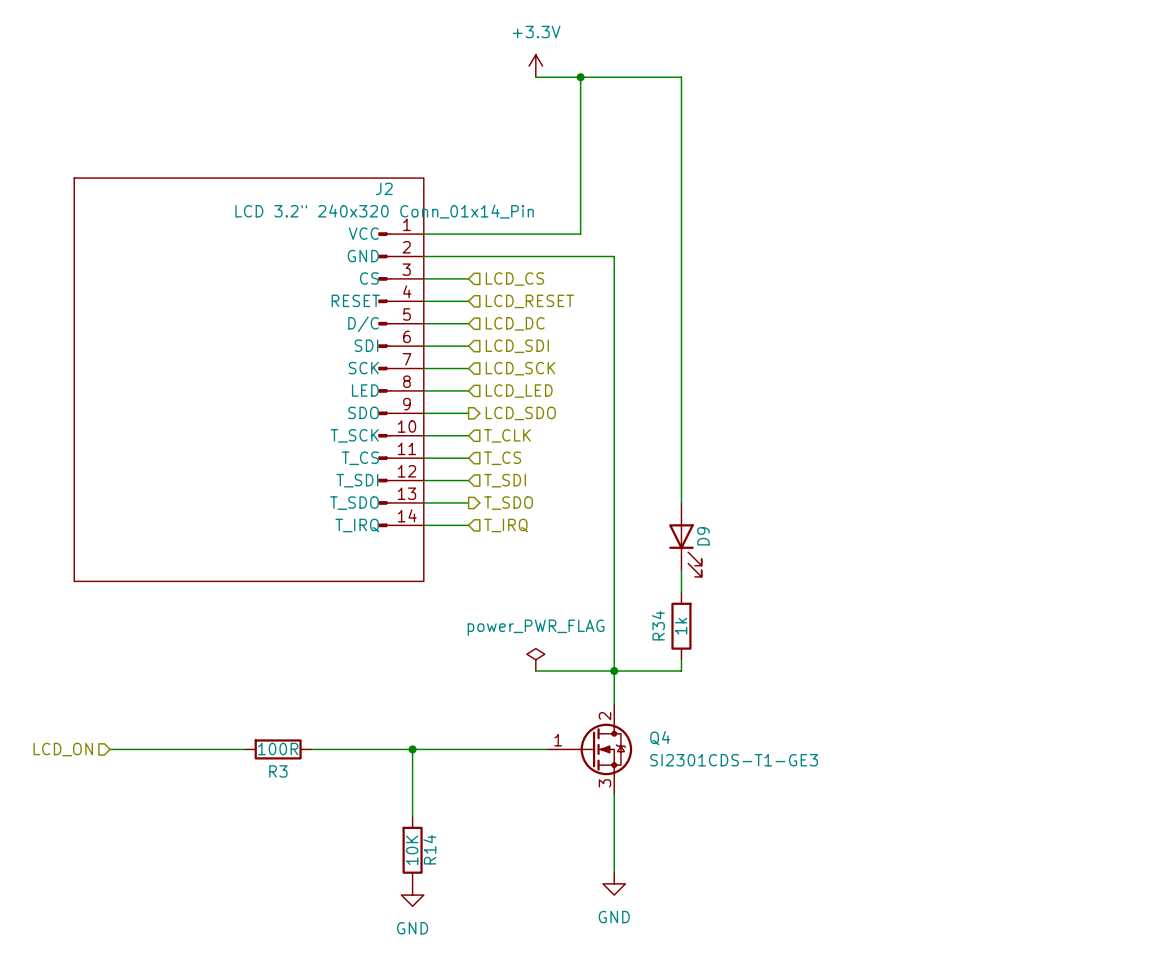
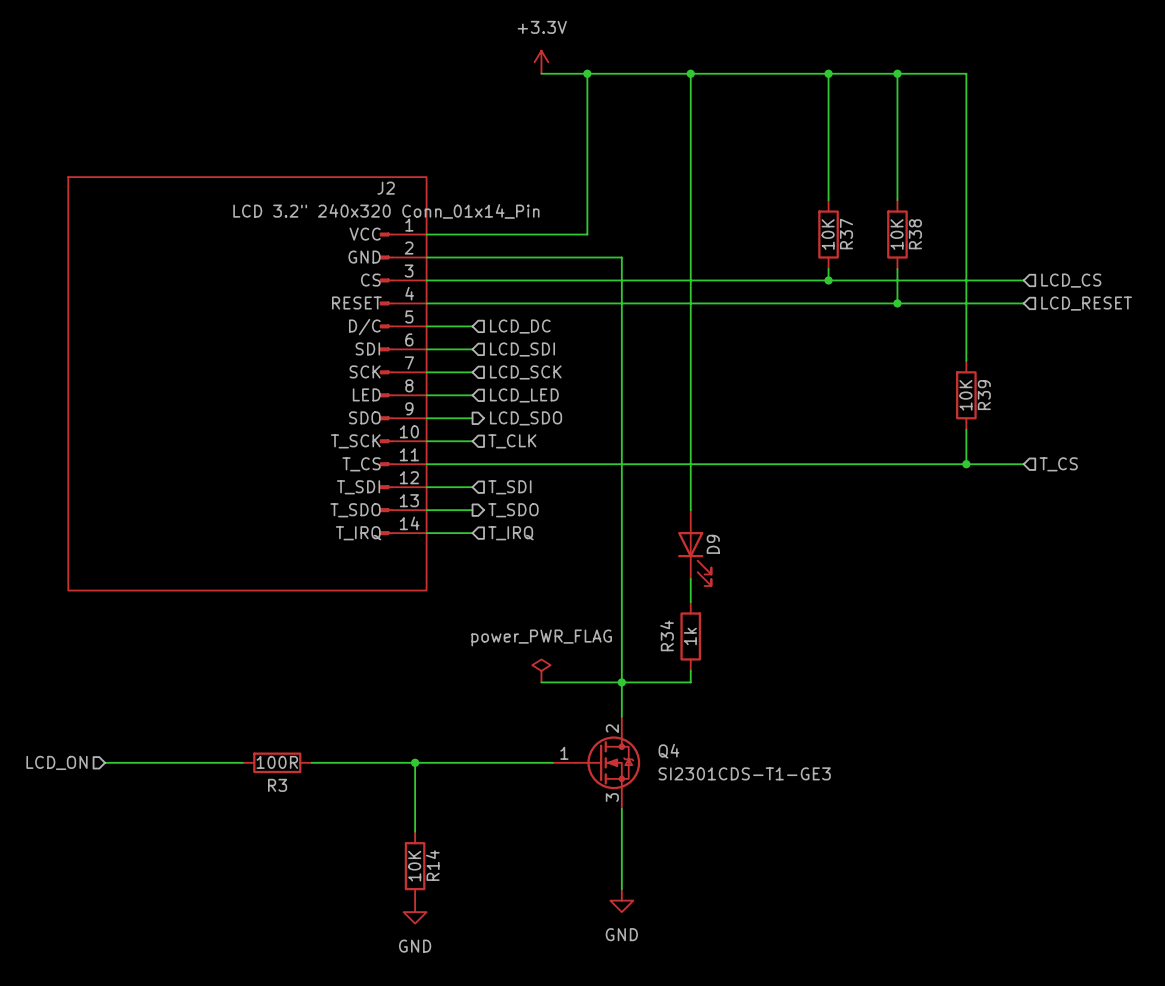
wire: none -> (690, 73) (966, 73) (966, 360)
junction: none -> (690, 73)
wire: none -> (828, 73) (828, 200)
junction: none -> (828, 73)
wire: none -> (897, 73) (897, 200)
junction: none -> (897, 73)
R37: none -> 10K (828, 234)
R38: none -> 10K (897, 234)
wire: none -> (828, 268) (828, 280)
wire: none -> (897, 268) (897, 303)
wire: none -> (472, 280) (1023, 280)
junction: none -> (828, 280)
hierarchical label: LCD_CS (514, 279) -> none
hierarchical label: none -> LCD_CS (1071, 280)
wire: none -> (472, 303) (1023, 303)
hierarchical label: LCD_RESET (529, 301) -> none
junction: none -> (897, 303)
hierarchical label: none -> LCD_RESET (1086, 303)
R39: none -> 10K (966, 395)
wire: none -> (966, 429) (966, 464)
wire: none -> (472, 464) (1023, 464)
hierarchical label: T_CS (502, 458) -> none
junction: none -> (966, 464)
hierarchical label: none -> T_CS (1058, 464)

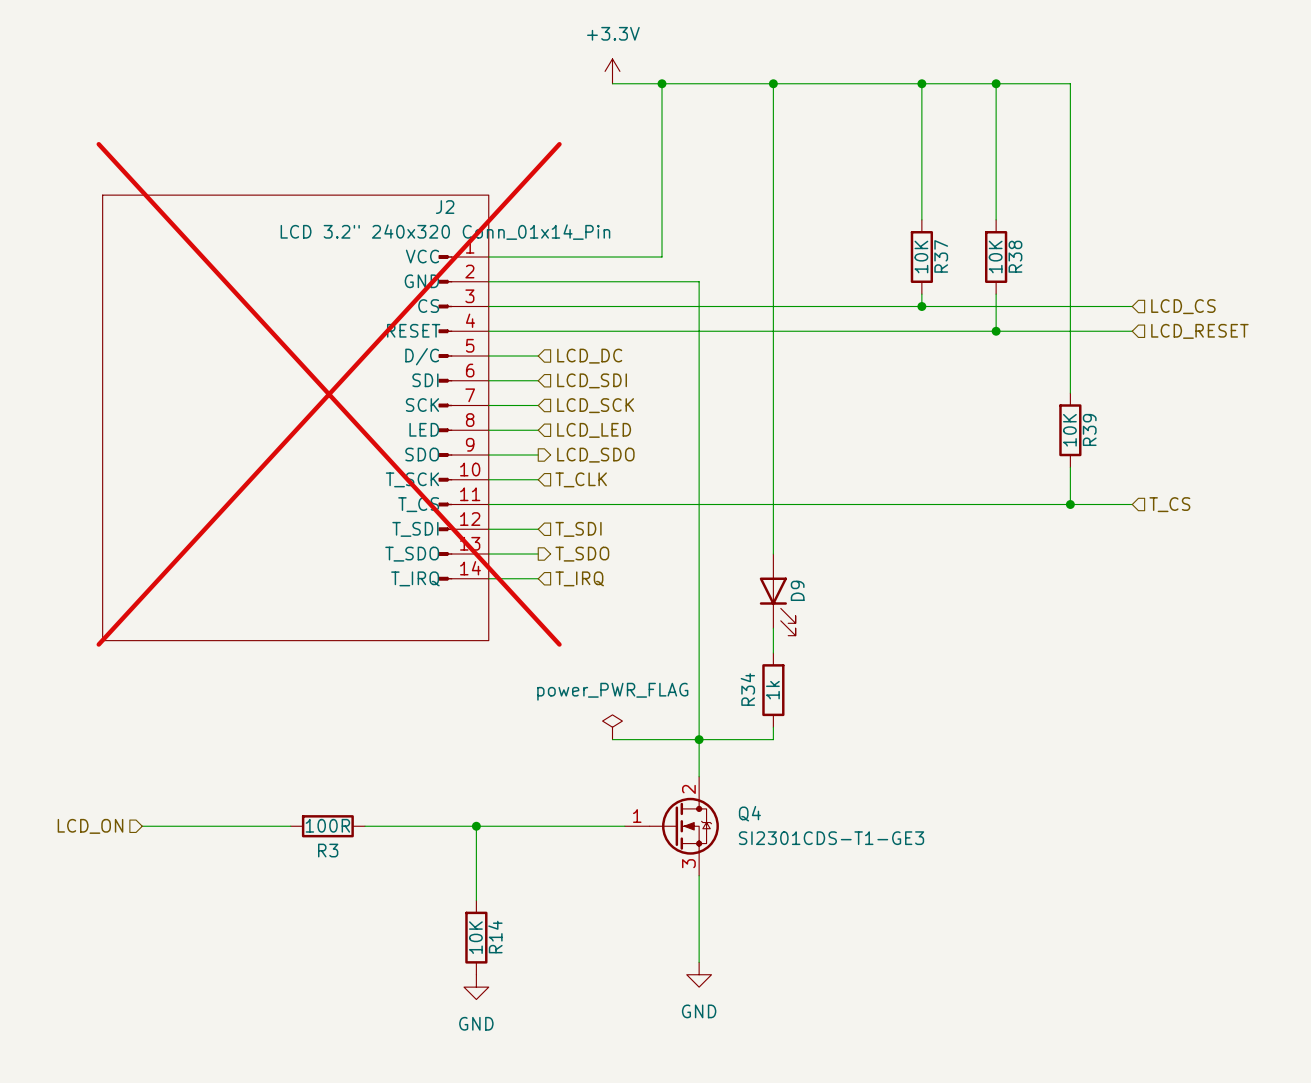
J2 do-not-place cross: none -> (329, 394)

